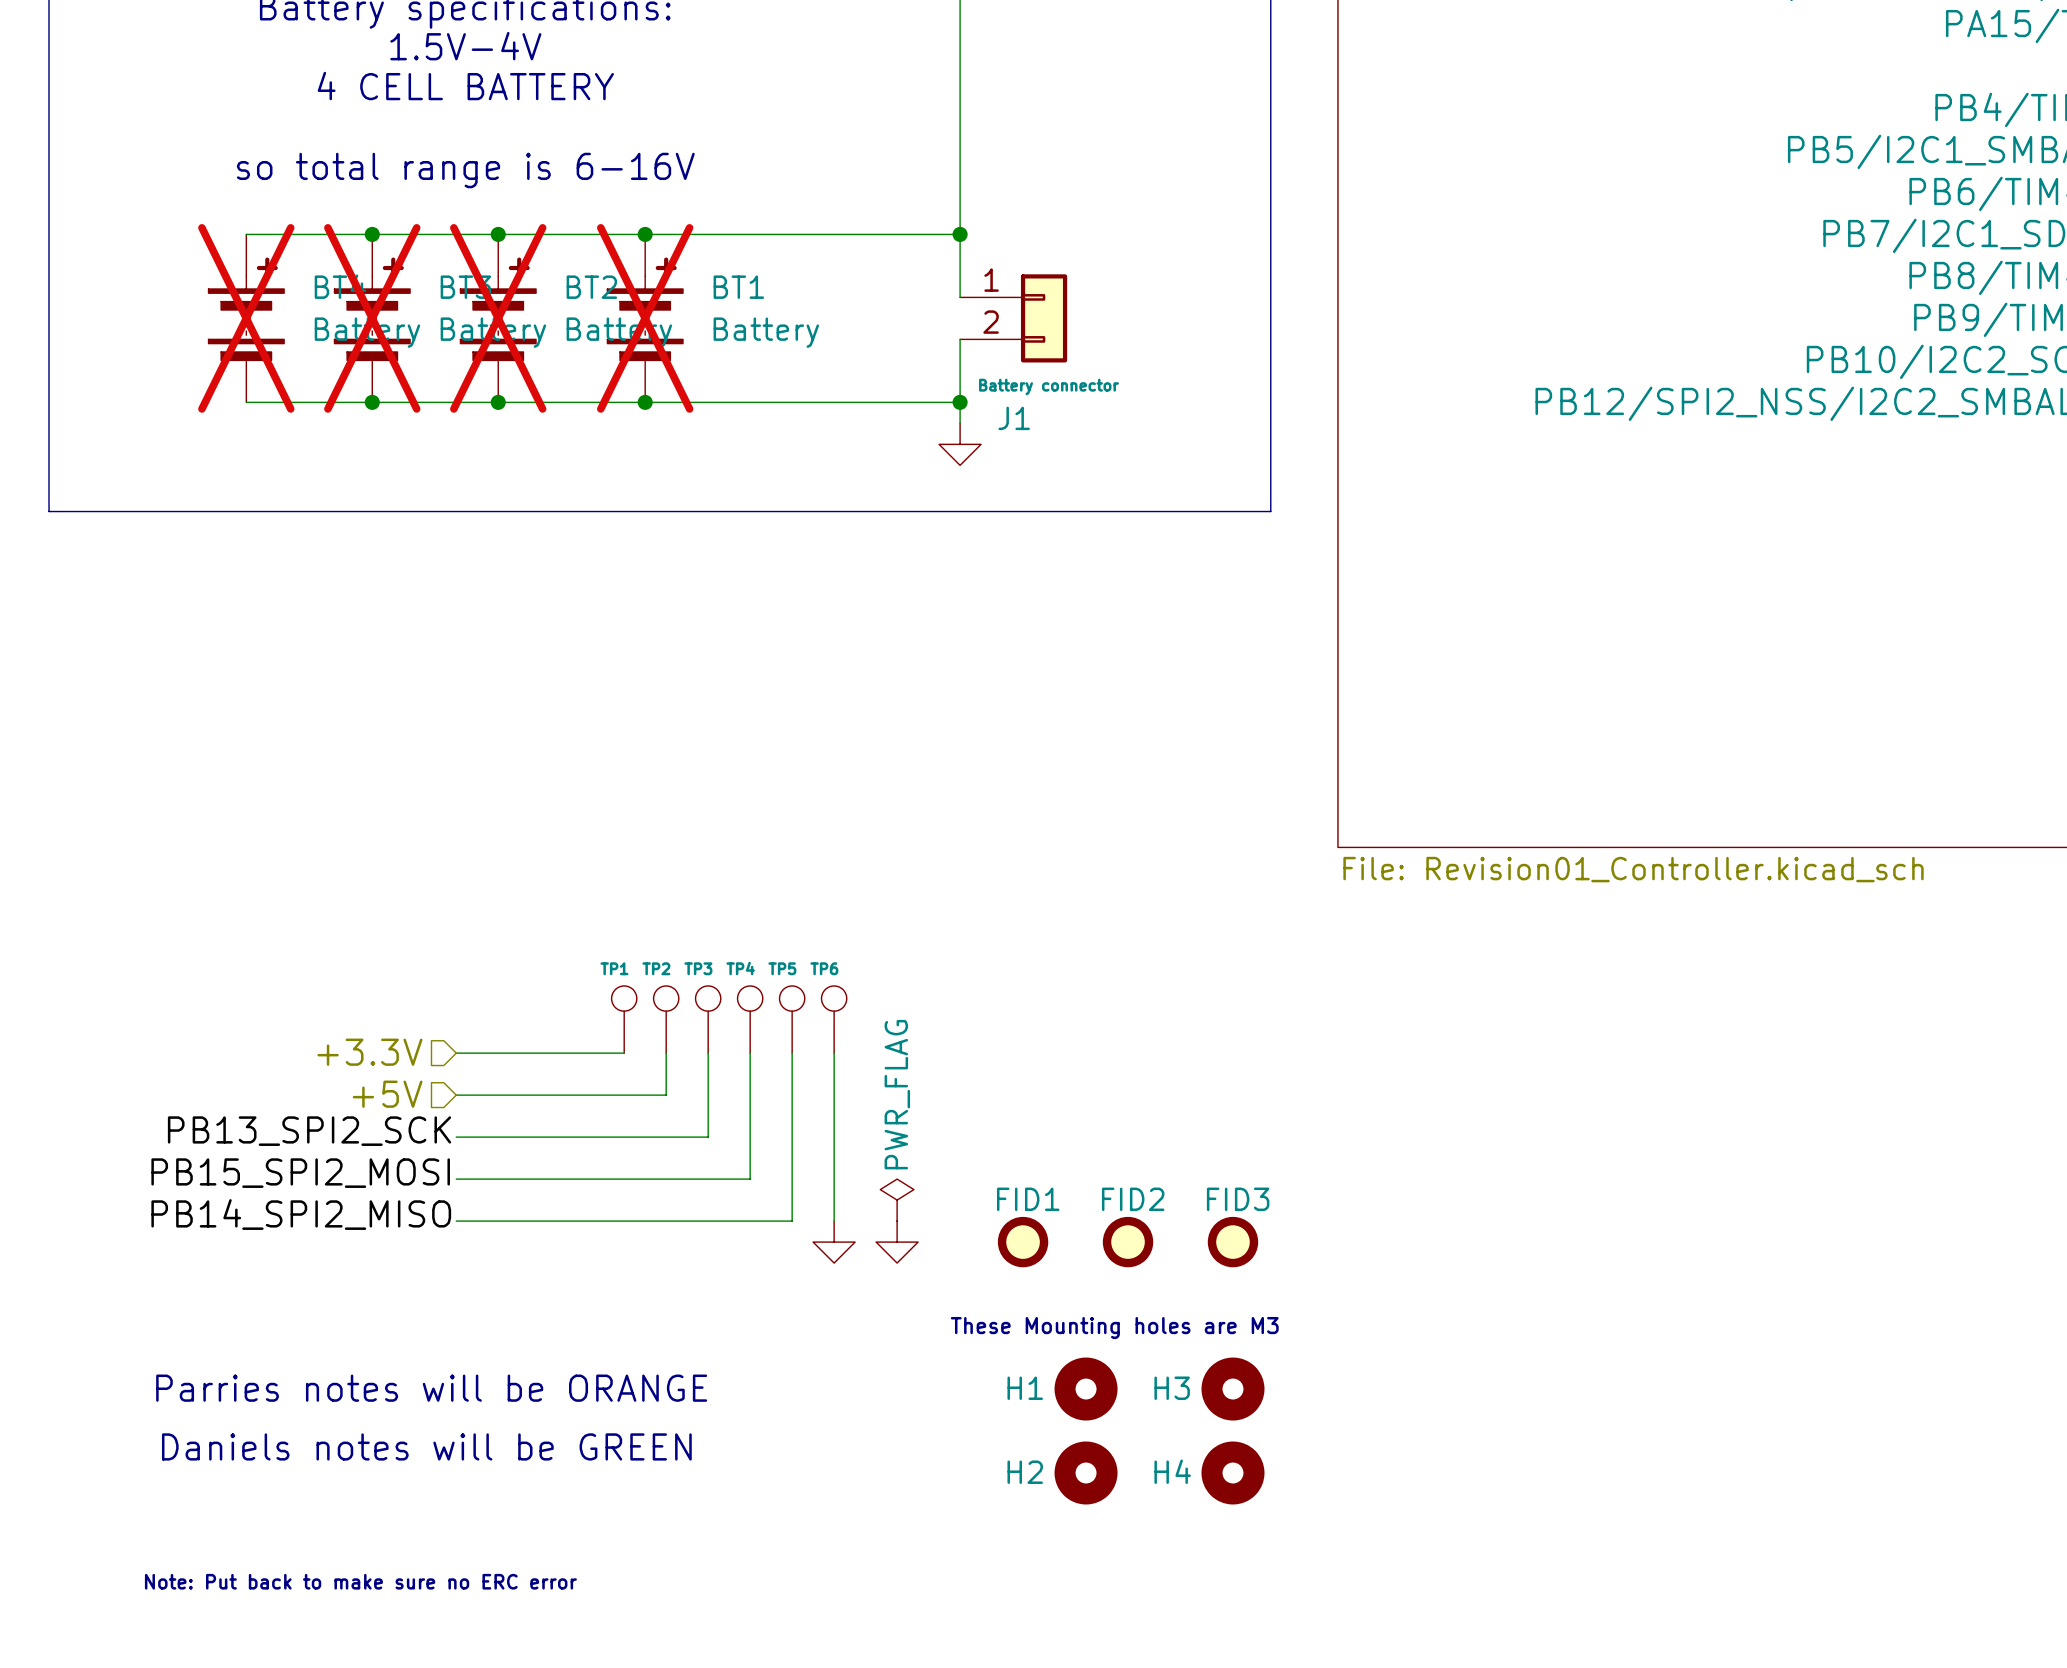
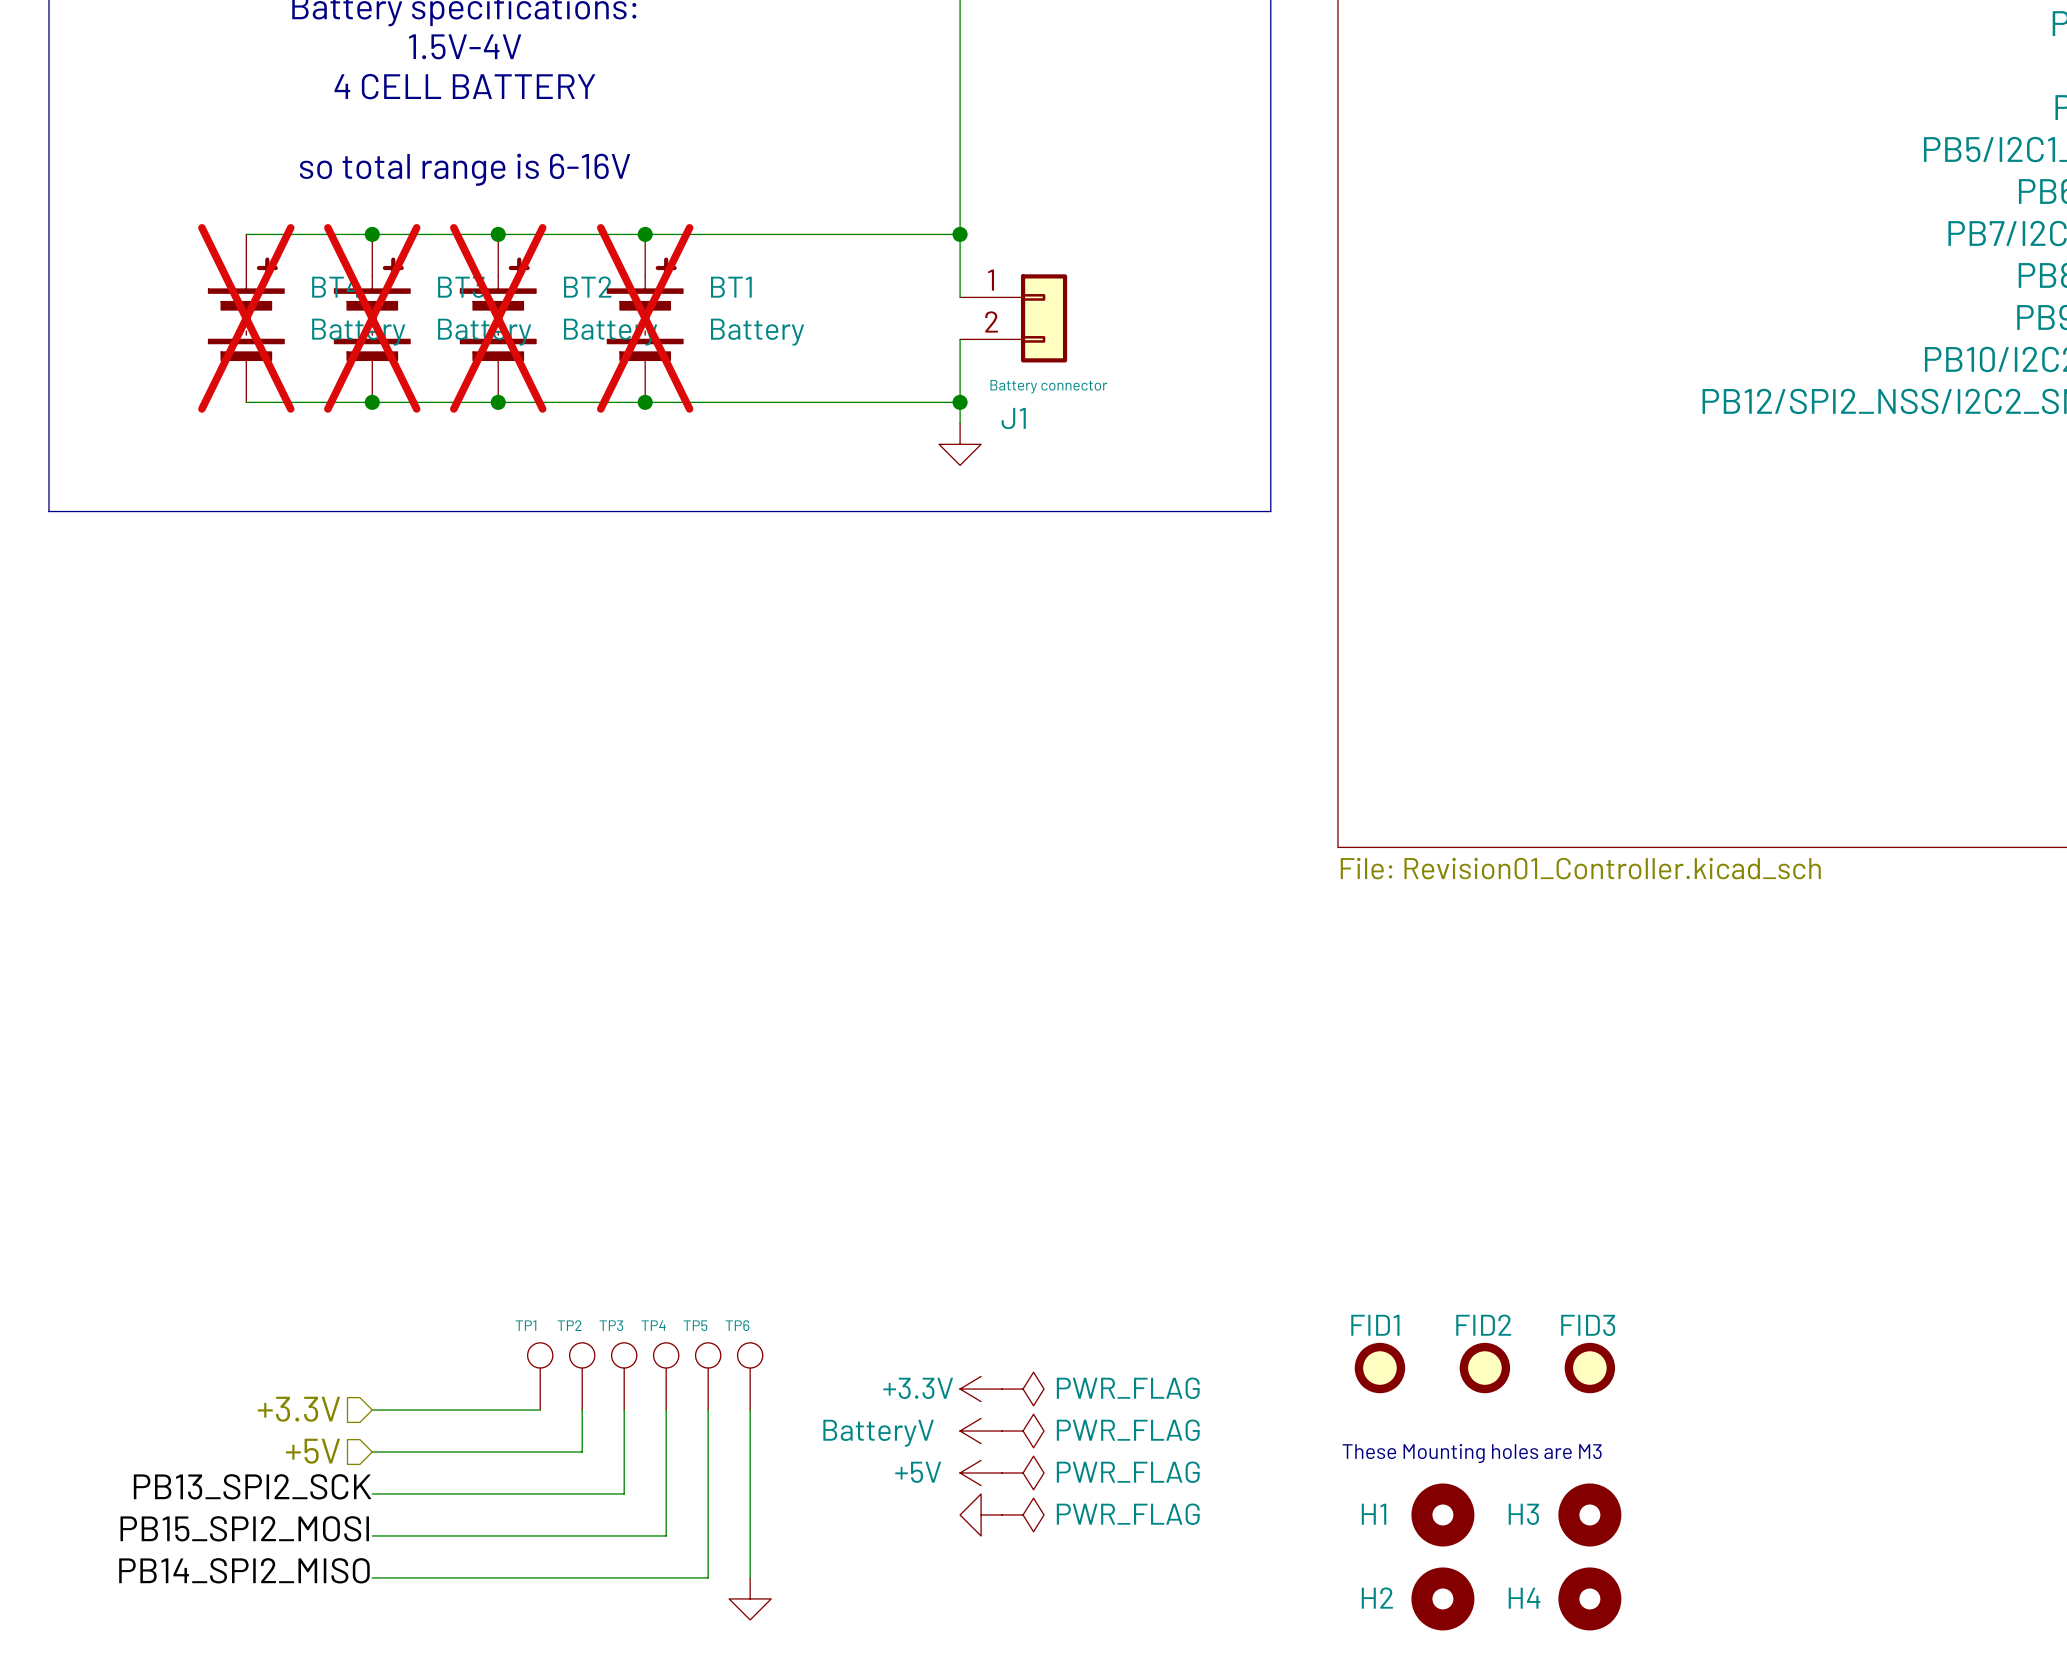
TP1 position: (624, 1019) -> (540, 1376)
TP2 position: (666, 1019) -> (582, 1376)
TP3 position: (708, 1019) -> (624, 1376)
TP4 position: (750, 1019) -> (666, 1376)
TP5 position: (792, 1019) -> (708, 1376)
TP6 position: (834, 1019) -> (750, 1376)
hierarchical label position: +3.3V (369, 1052) -> +3.3V (298, 1409)
wire: (456, 1053) (624, 1053) -> (372, 1410) (540, 1410)
wire: (666, 1053) (666, 1095) (456, 1095) -> (582, 1410) (582, 1452) (372, 1452)
wire: (708, 1053) (708, 1137) (456, 1137) -> (624, 1410) (624, 1493) (372, 1493)
wire: (750, 1053) (750, 1179) (456, 1179) -> (666, 1410) (666, 1535) (372, 1535)
wire: (792, 1053) (792, 1221) (456, 1221) -> (708, 1410) (708, 1577) (372, 1577)
wire: (834, 1053) (834, 1221) -> (750, 1410) (750, 1577)
hierarchical label position: +5V (387, 1094) -> +5V (313, 1451)
label position: PB13_SPI2_SCK (309, 1131) -> PB13_SPI2_SCK (252, 1486)
label position: PB15_SPI2_MOSI (300, 1173) -> PB15_SPI2_MOSI (244, 1528)
power symbol: PWR_FLAG (897, 1200) -> none
label position: PB14_SPI2_MISO (301, 1214) -> PB14_SPI2_MISO (244, 1570)
power symbol: (834, 1242) -> none
power symbol: (897, 1242) -> none
FID1 position: (1023, 1242) -> (1379, 1368)
FID2 position: (1128, 1242) -> (1484, 1368)
FID3 position: (1232, 1242) -> (1589, 1368)
text position: These Mounting holes are M3 (1114, 1328) -> These Mounting holes are M3 (1472, 1453)
text: Parries notes will be ORANGE (431, 1388) -> none
power symbol: none -> +3.3V (981, 1389)
power symbol: none -> PWR_FLAG (1023, 1389)
H1 position: (1086, 1389) -> (1442, 1514)
H3 position: (1232, 1389) -> (1589, 1514)
power symbol: none -> BatteryV (981, 1431)
power symbol: none -> PWR_FLAG (1023, 1431)
text: Daniels notes will be GREEN (426, 1446) -> none
power symbol: none -> +5V (981, 1473)
power symbol: none -> PWR_FLAG (1023, 1473)
H2 position: (1086, 1473) -> (1442, 1598)
H4 position: (1232, 1473) -> (1589, 1598)
power symbol: none -> (981, 1514)
power symbol: none -> PWR_FLAG (1023, 1514)
text: Note: Put back to make sure no ERC error (360, 1581) -> none
power symbol: none -> (750, 1598)

